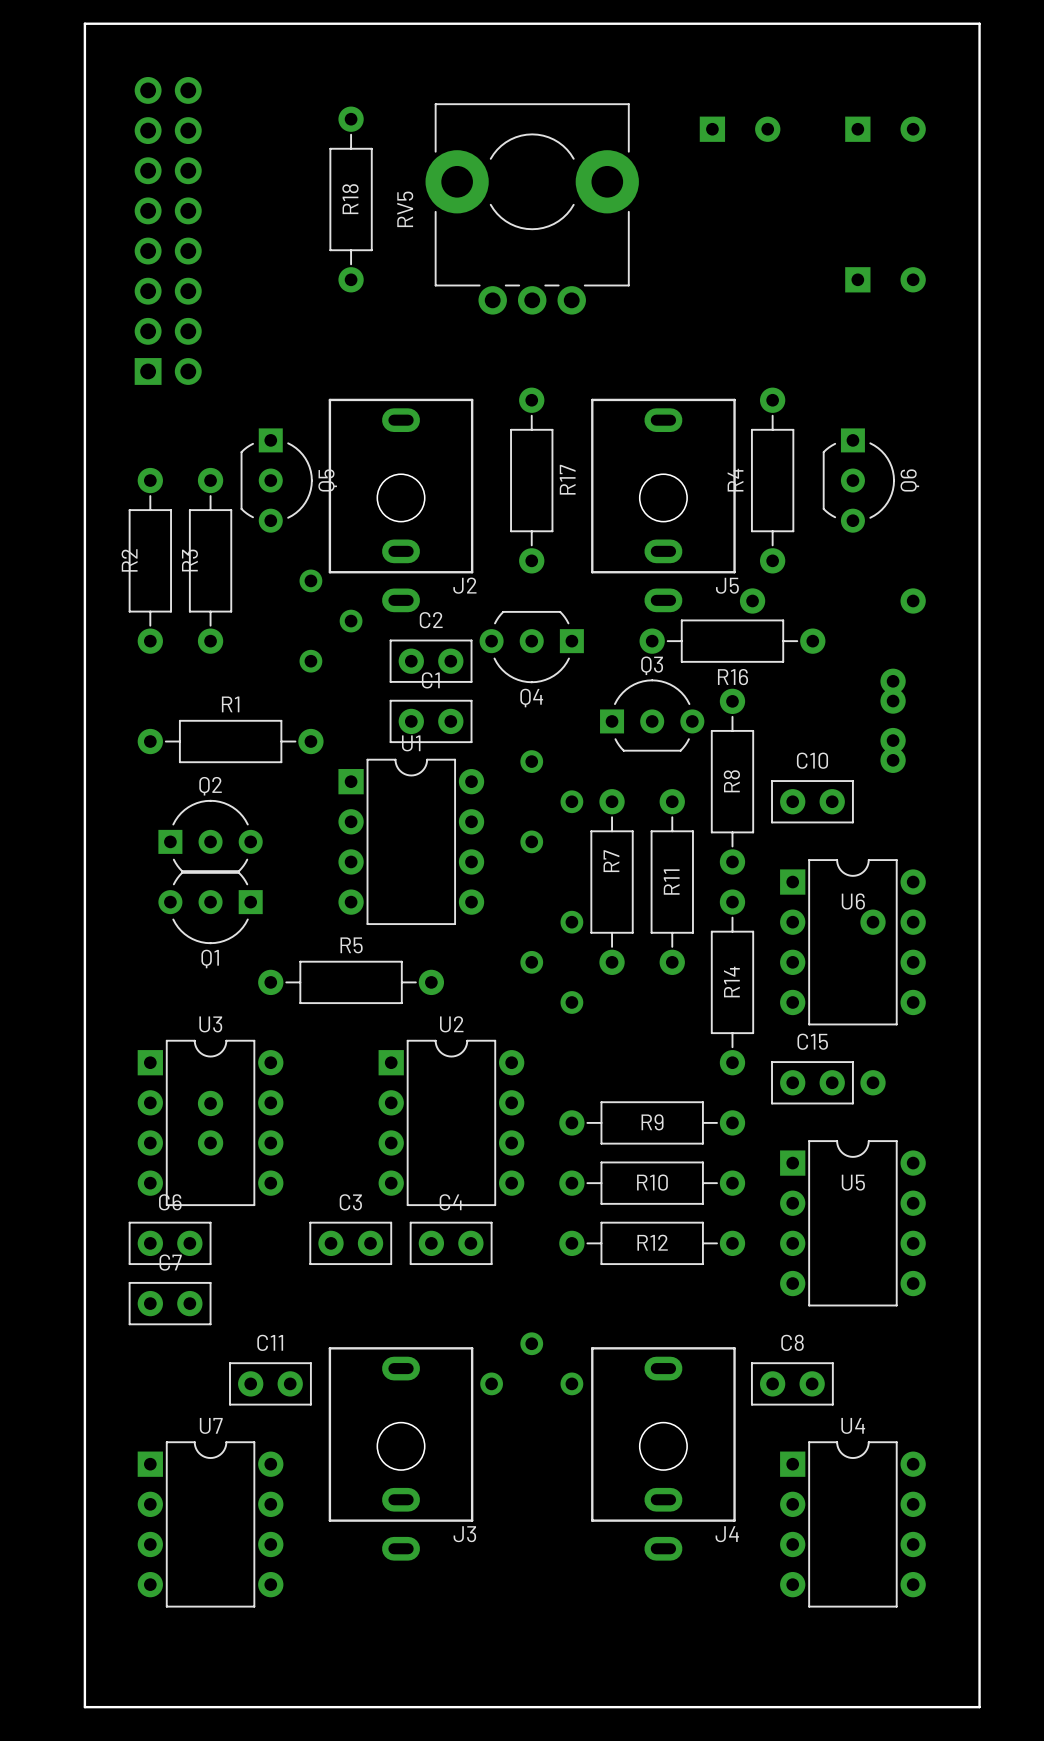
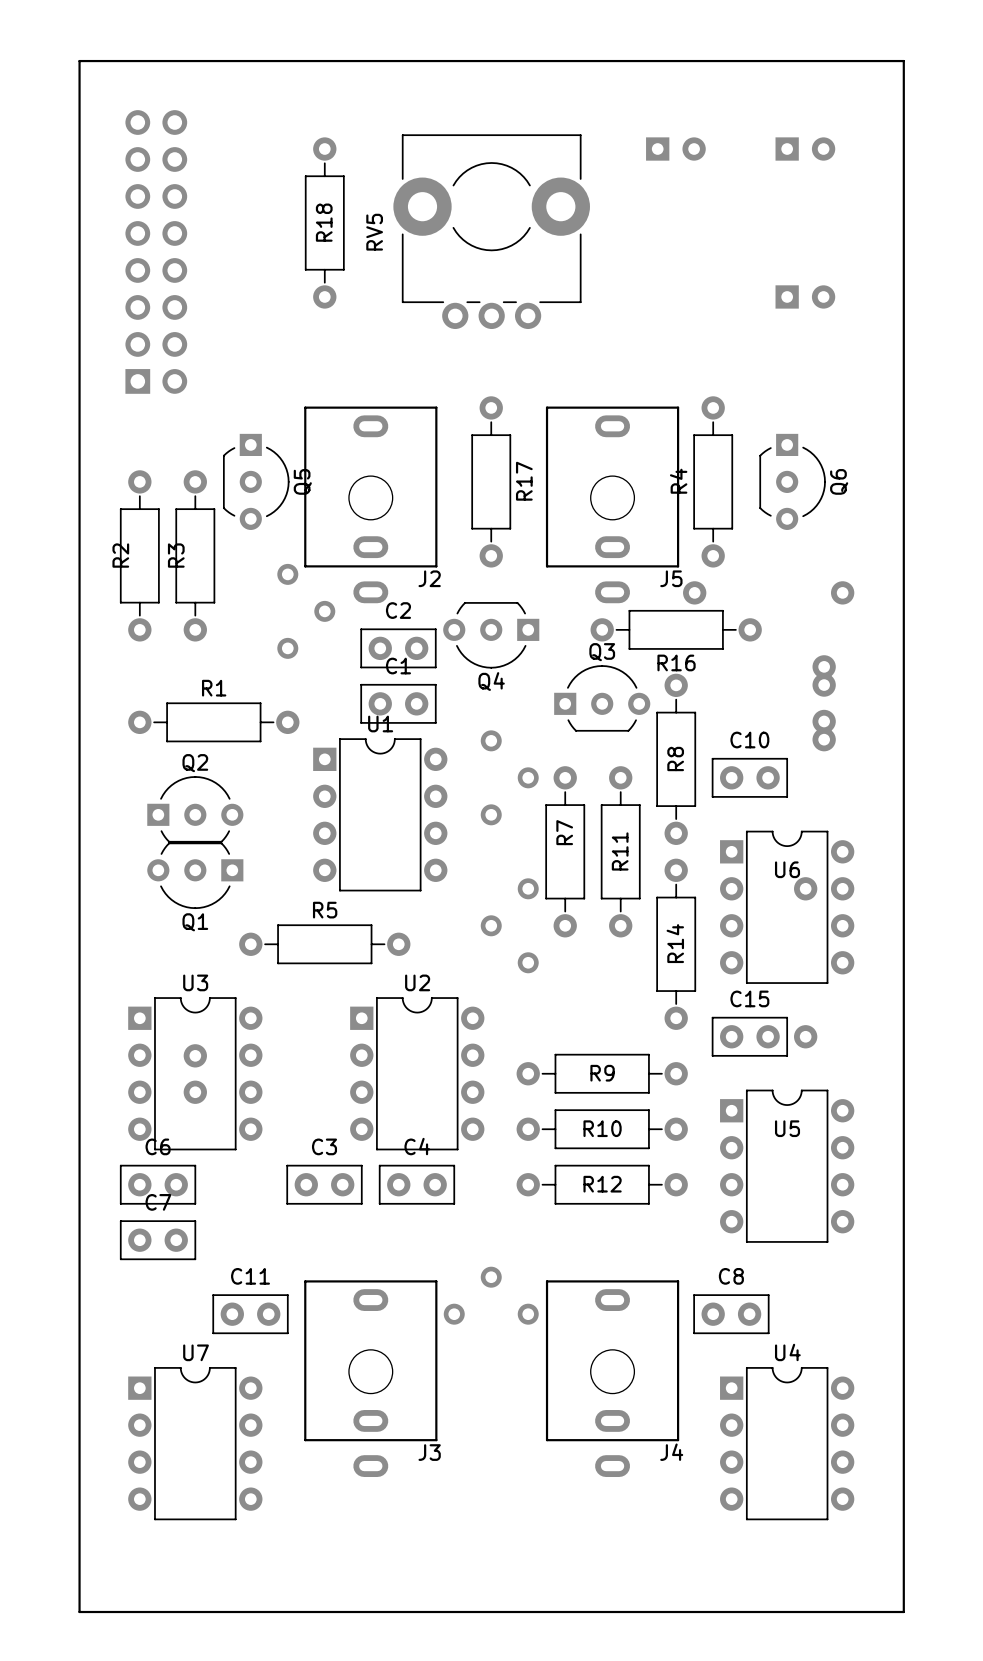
part footprint: [699, 116, 781, 142] -> [646, 137, 706, 161]
part: none -> (805, 149)
part: (885, 129) -> none
part footprint: [845, 267, 926, 293] -> [775, 285, 836, 309]

